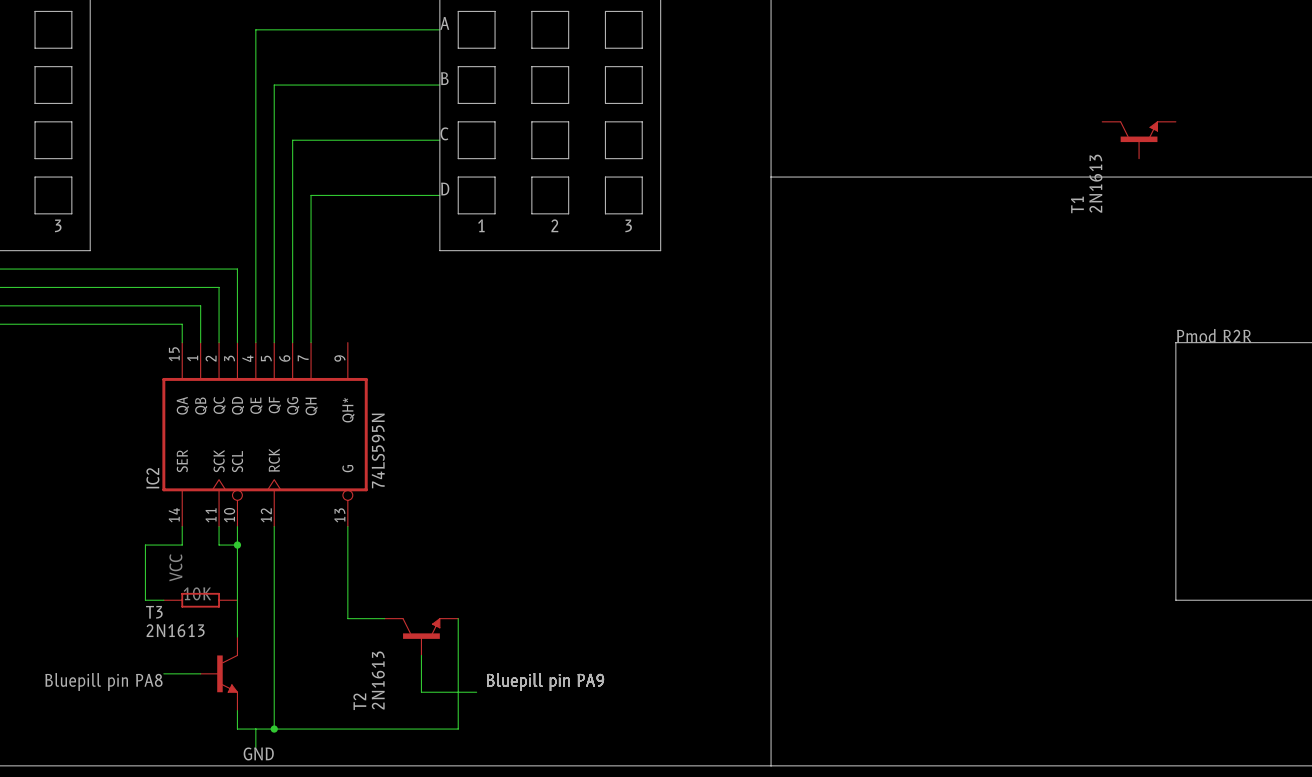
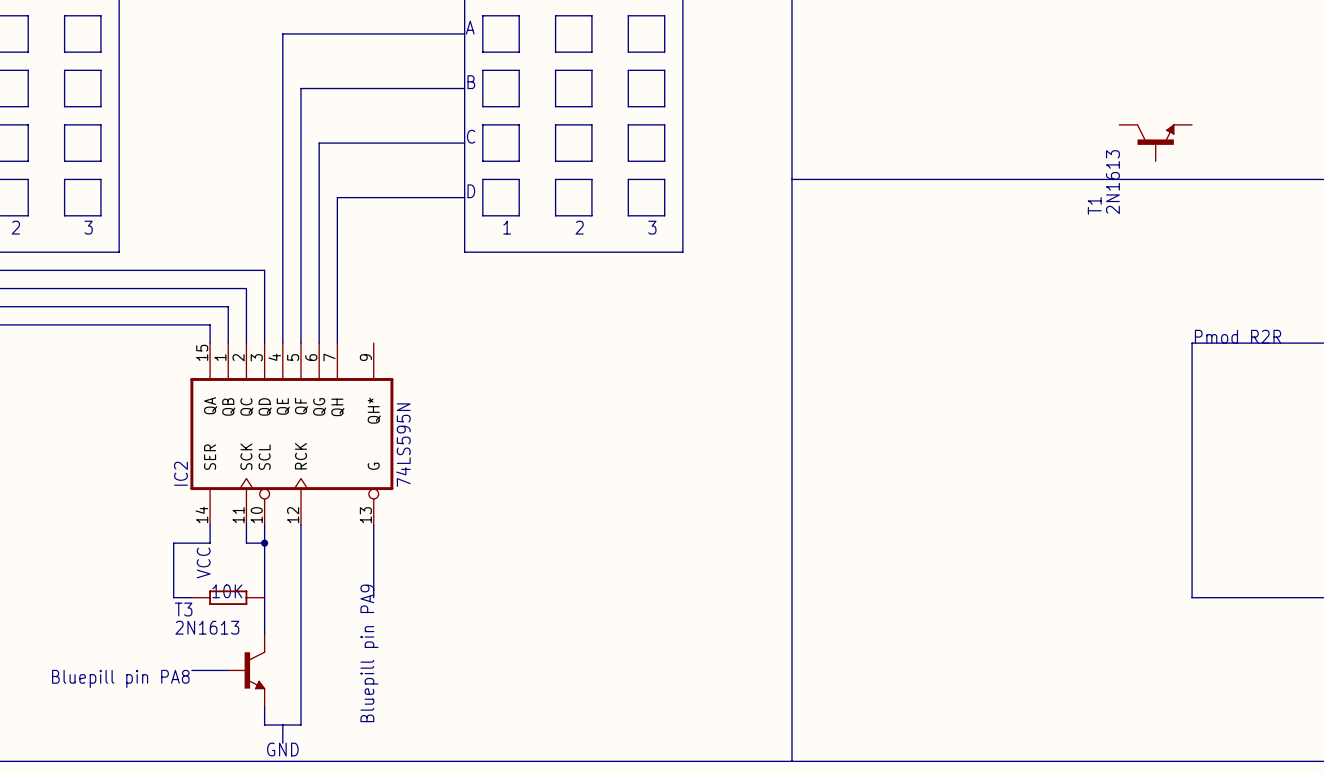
wire: (347, 600) (347, 618) (384, 618) -> none
wire: (458, 618) (458, 729) (274, 729) -> none
T2: 2N1613 (421, 636) -> none
wire: (421, 655) (421, 692) (476, 692) -> none
text: none -> Bluepill pin PA9 (369, 653)
text: Bluepill pin PA9 (545, 681) -> none
junction: (274, 729) -> none

